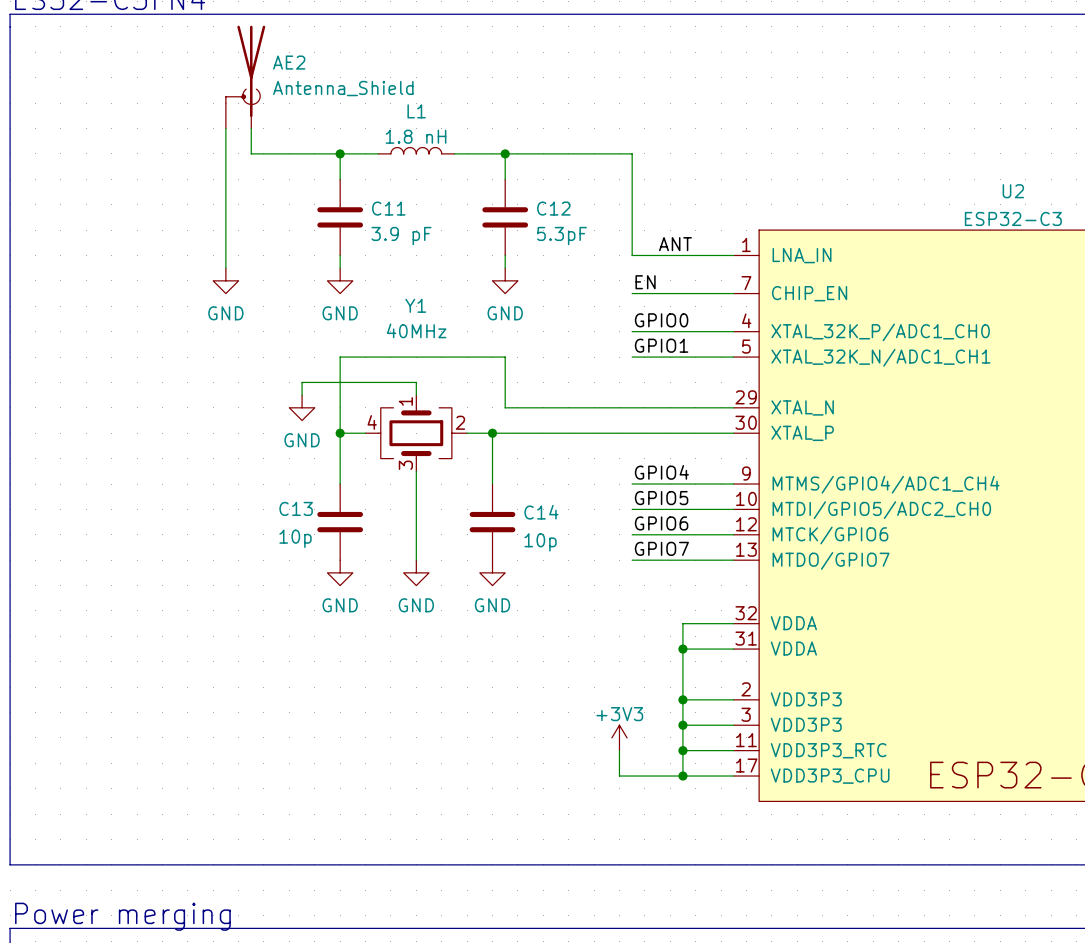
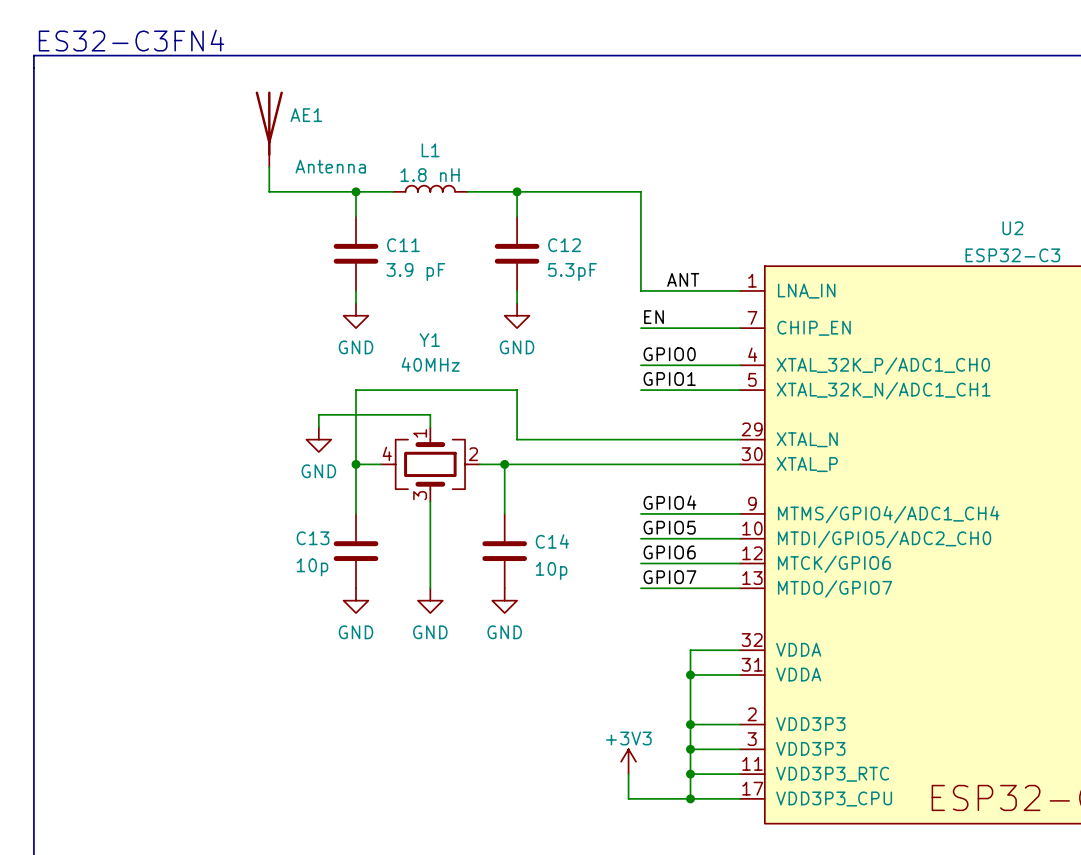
AE2: Antenna_Shield (245, 77) -> none
AE1: none -> Antenna (269, 129)
wire: (225, 128) (225, 268) -> none
power symbol: GND (225, 280) -> none

